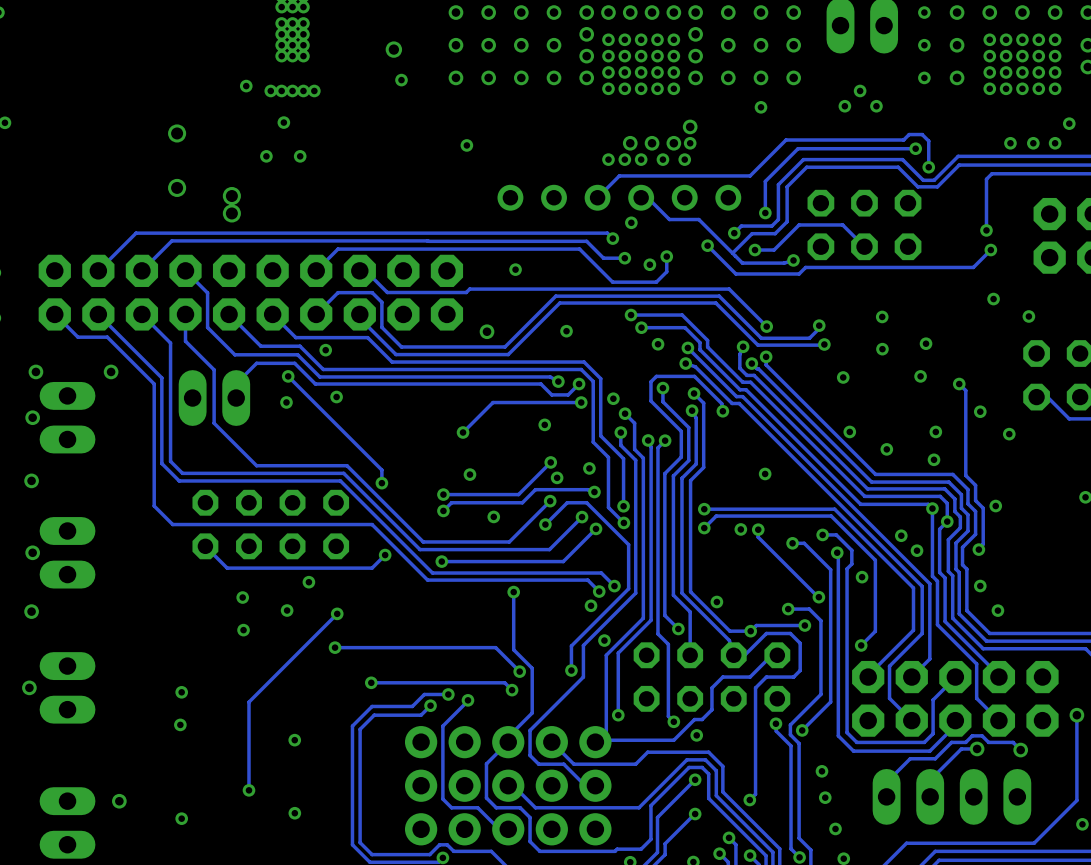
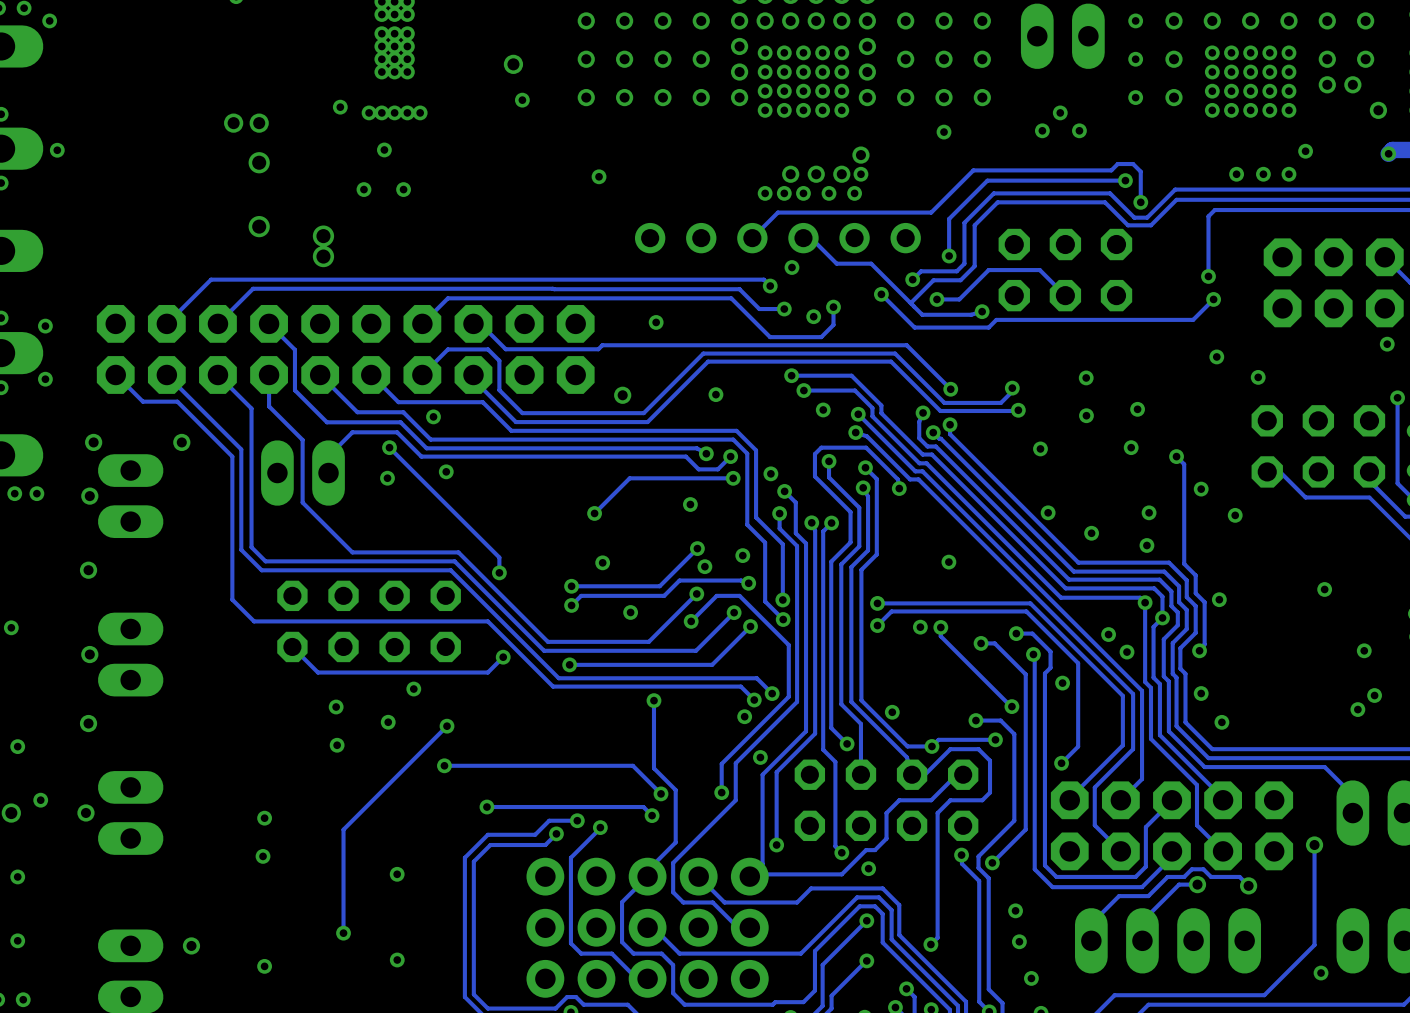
via: none -> (233, 123)
via: none -> (259, 123)

